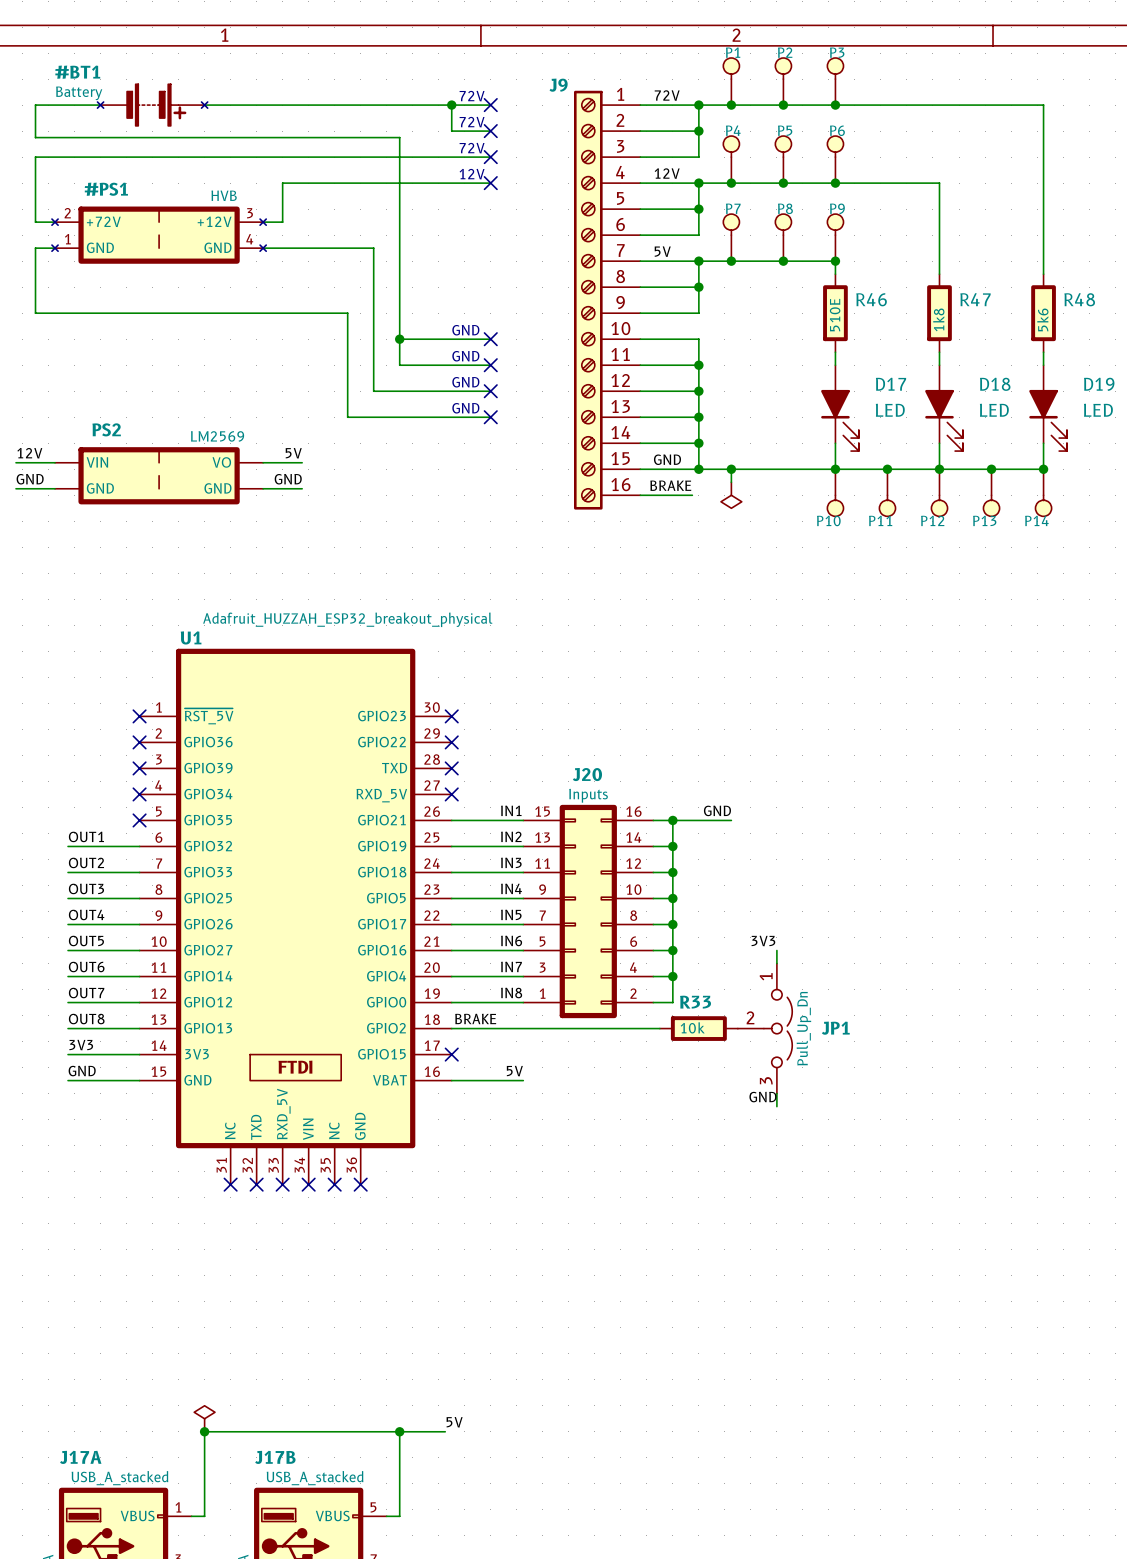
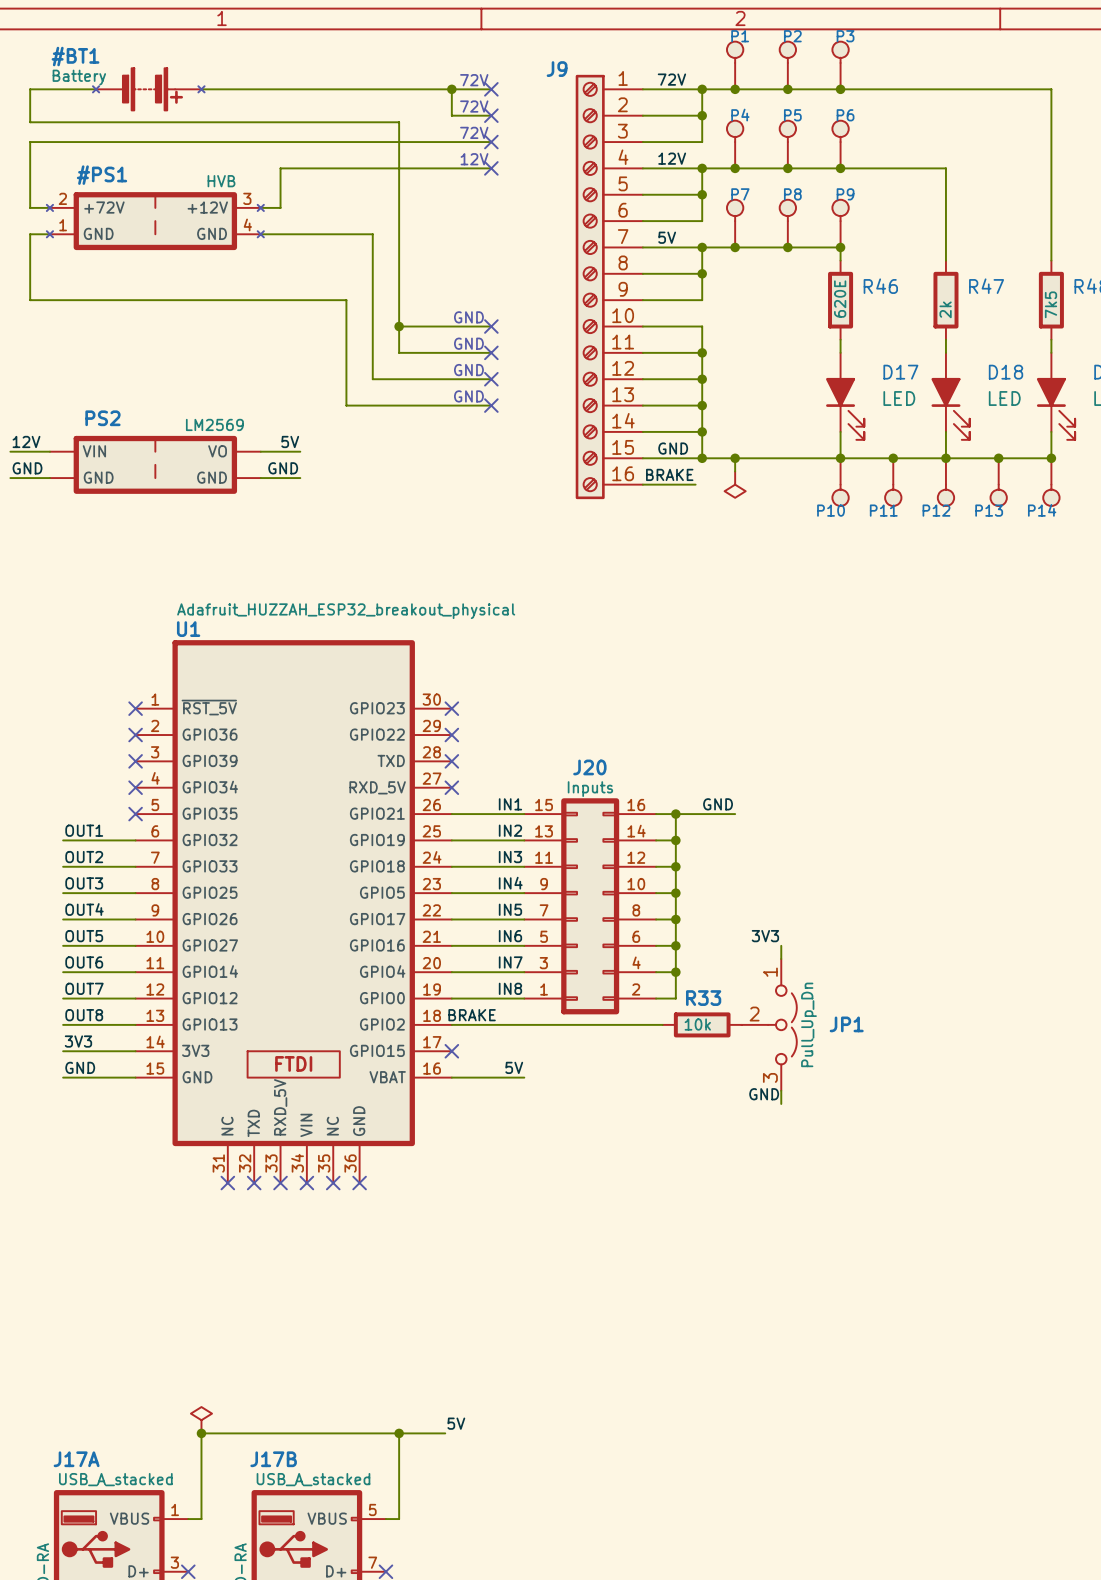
R46 value: 510E (835, 315) -> 620E (840, 299)
R47 value: 1k8 (938, 319) -> 2k (945, 309)
R48 value: 5k6 (1042, 319) -> 7k5 (1051, 304)

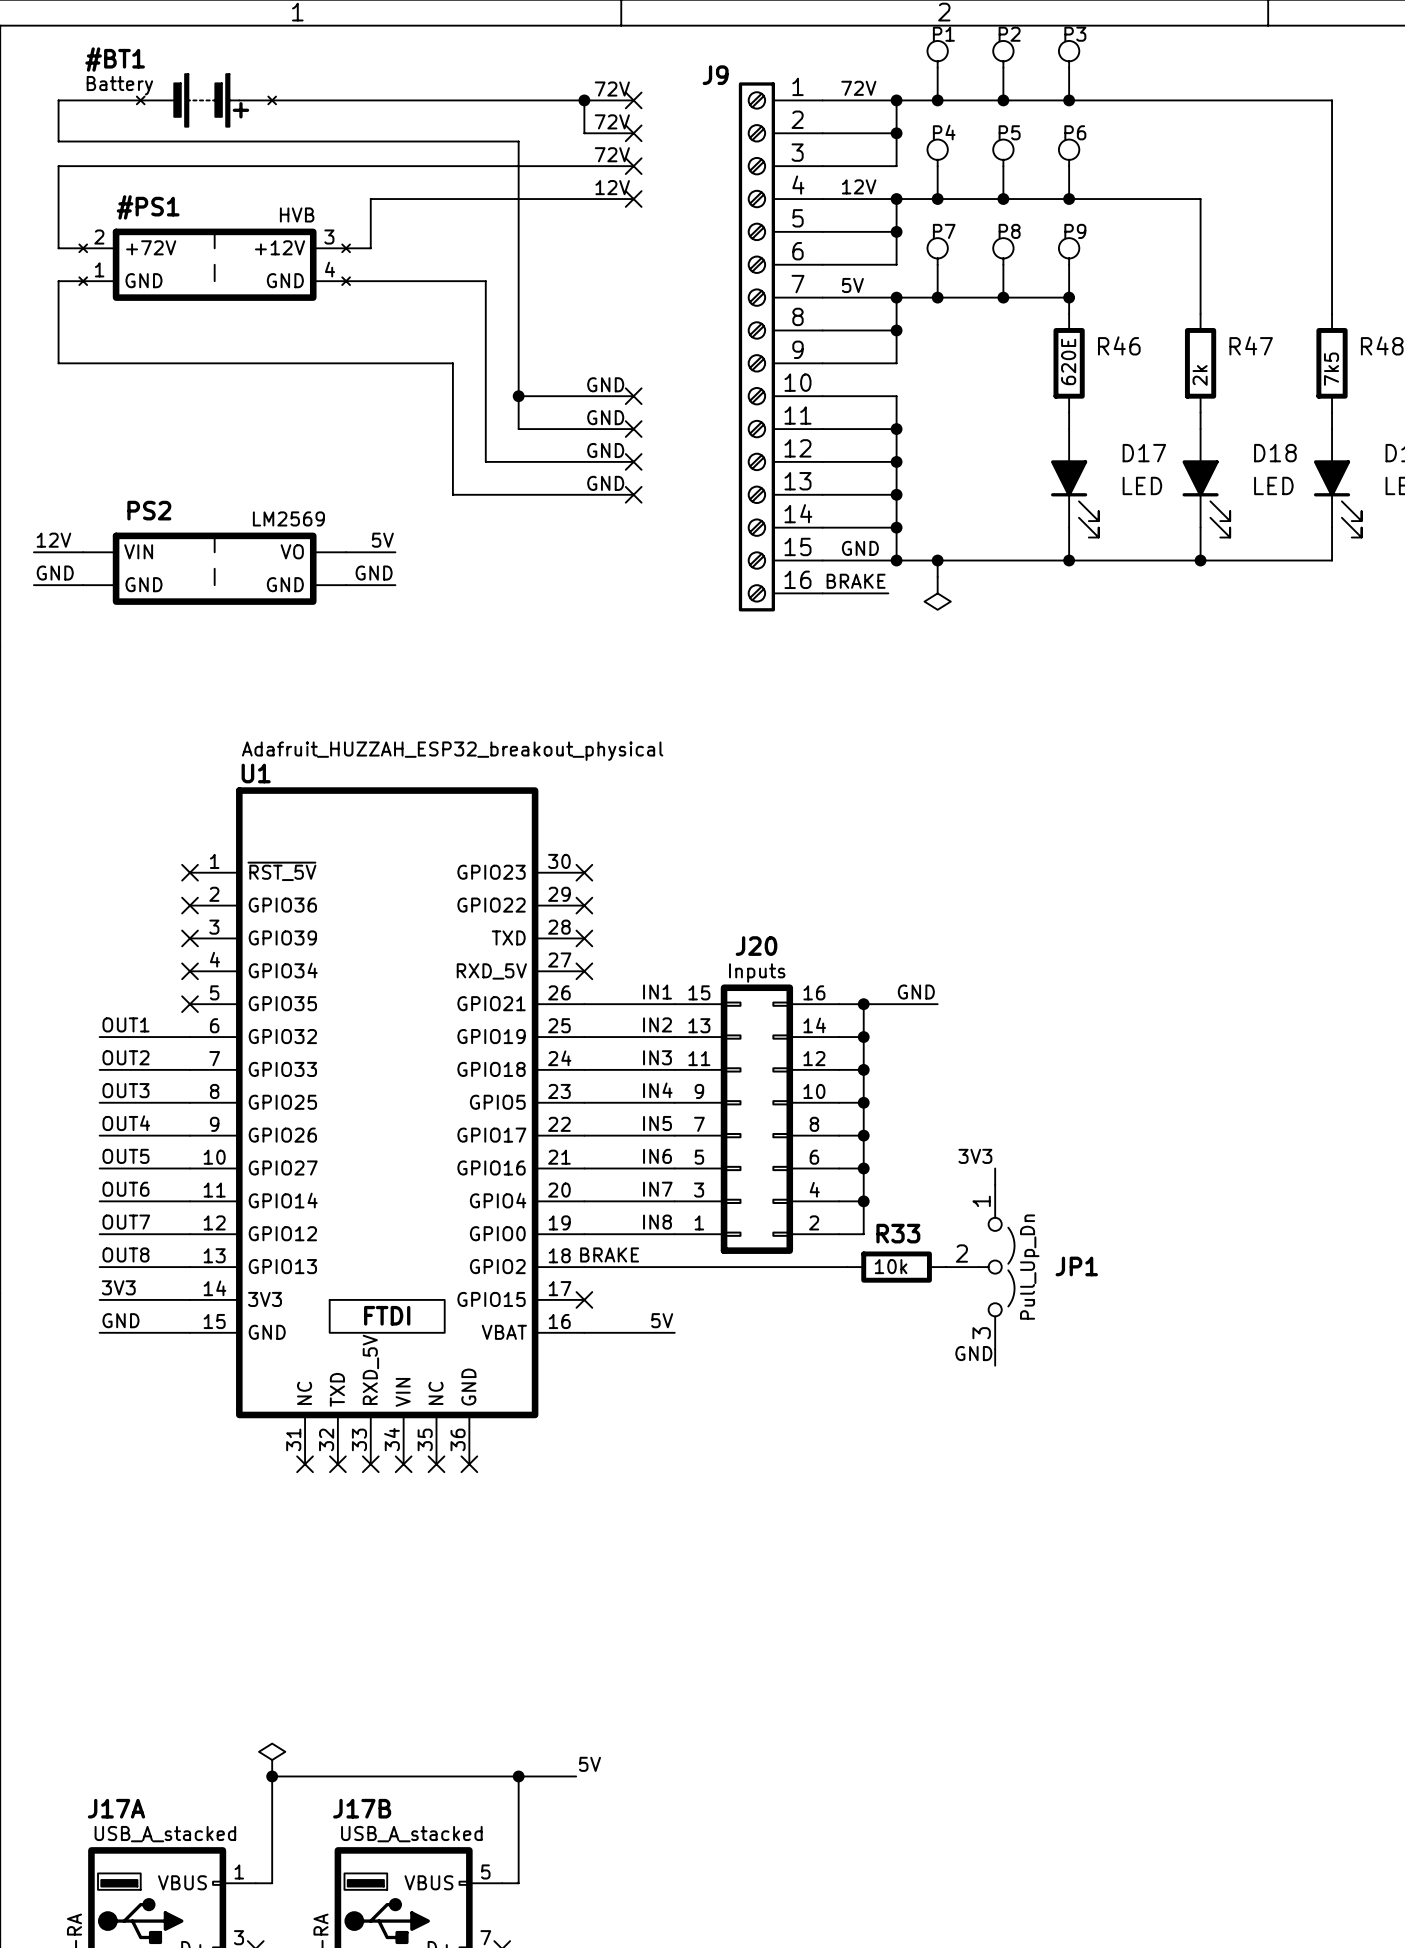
junction: (893, 458) -> none
junction: (998, 458) -> none
junction: (1051, 458) -> none
P10: (840, 482) -> none
P11: (893, 482) -> none
P12: (945, 482) -> none
P13: (998, 482) -> none
P14: (1051, 482) -> none

